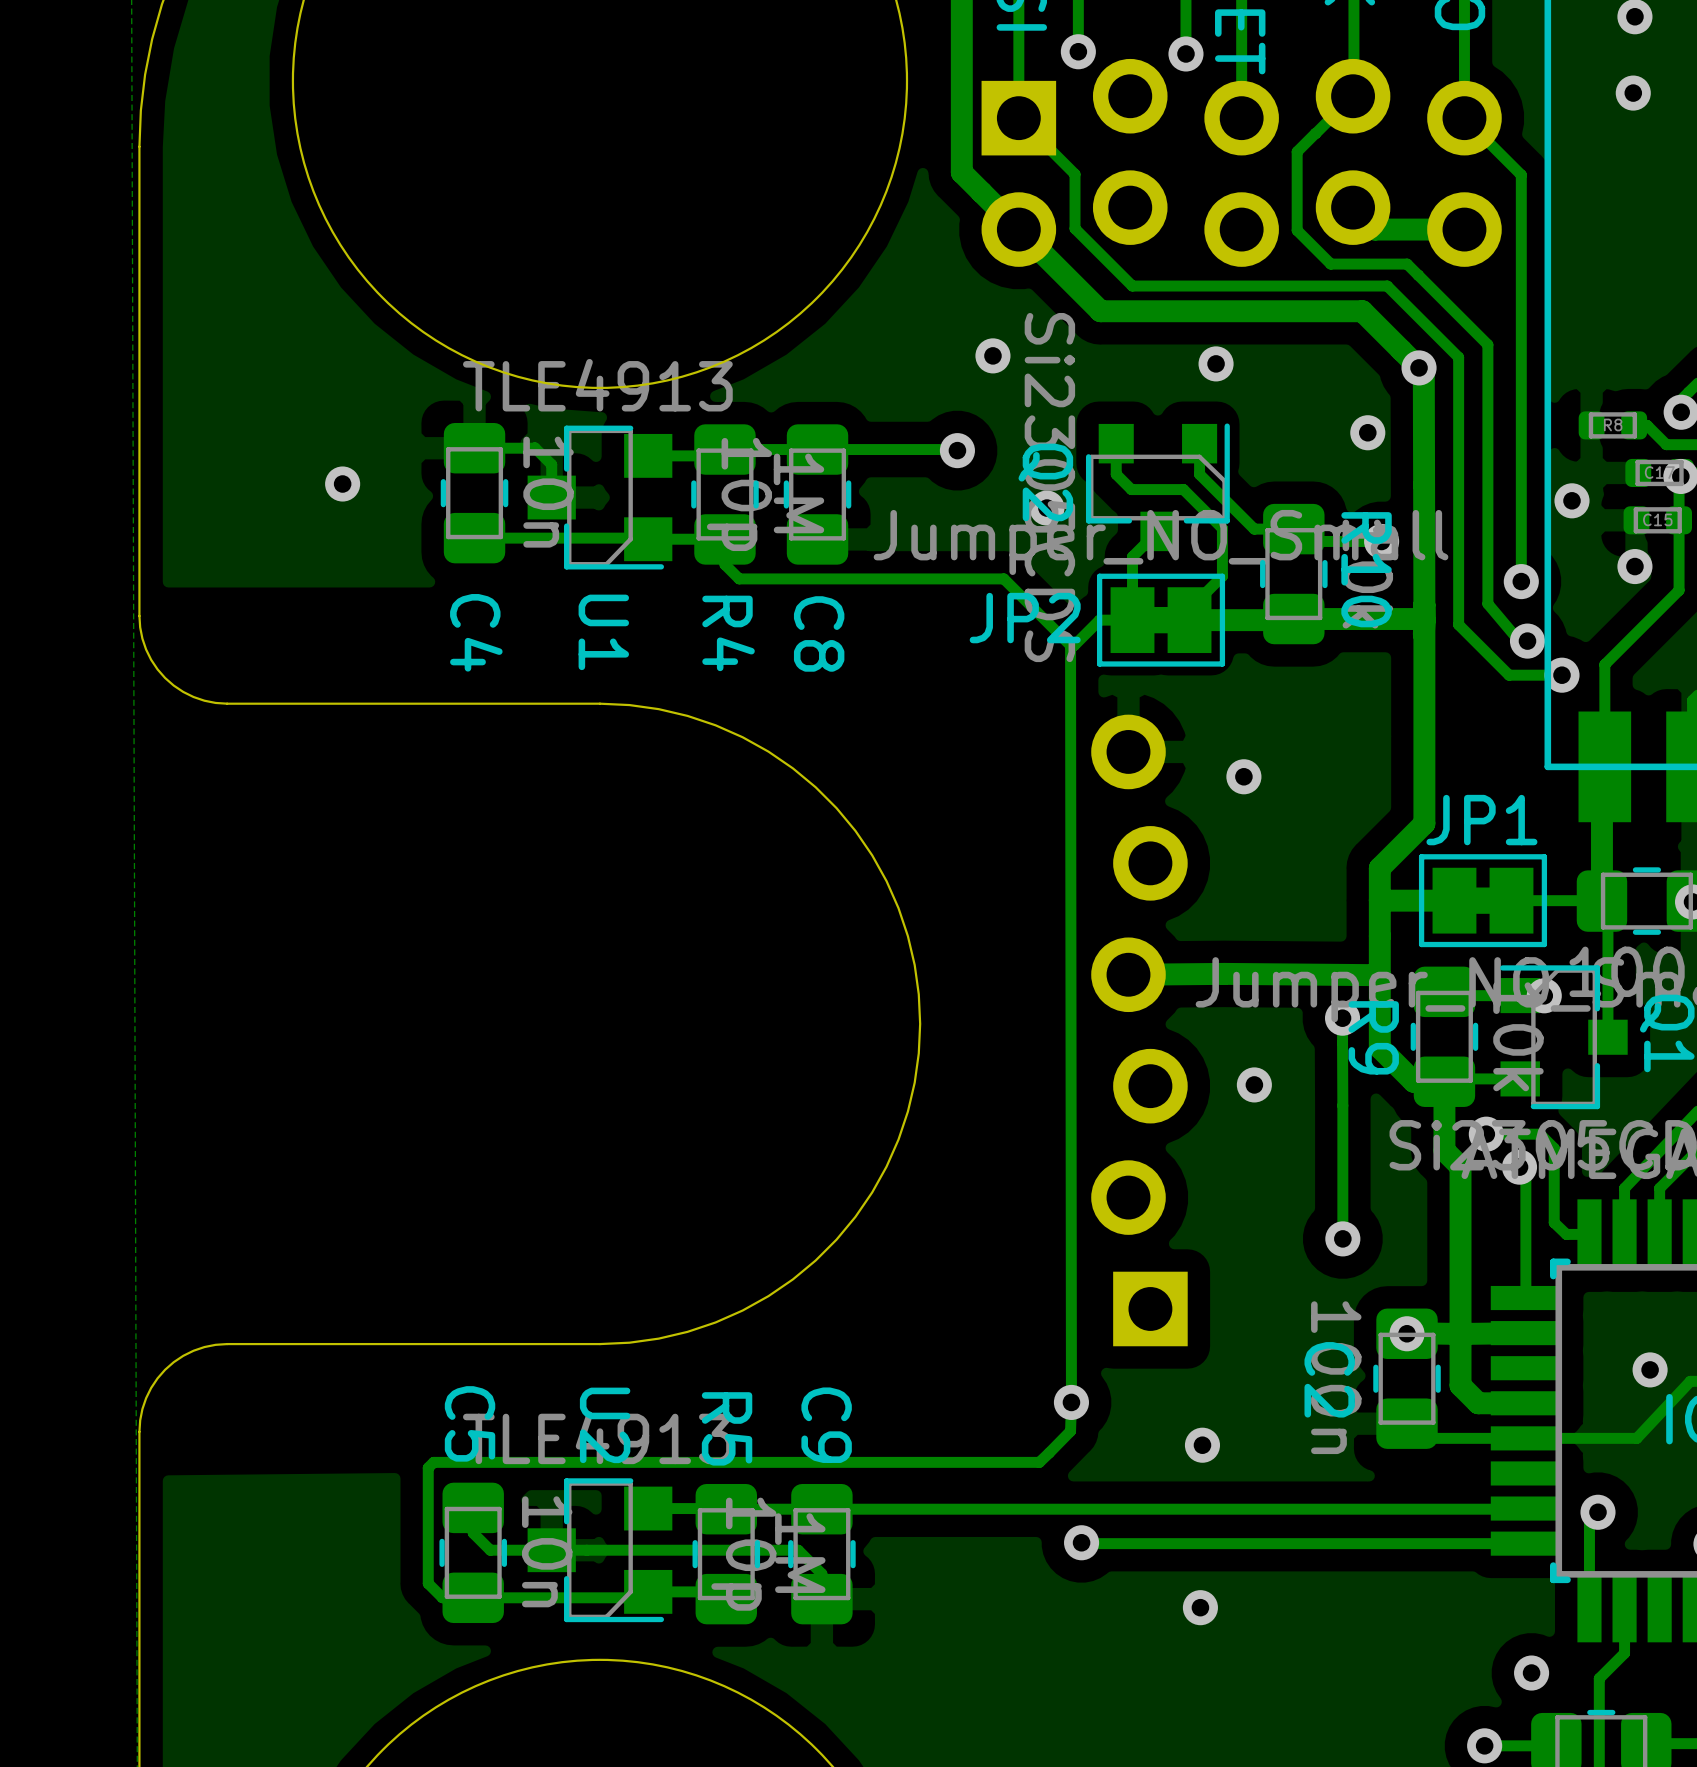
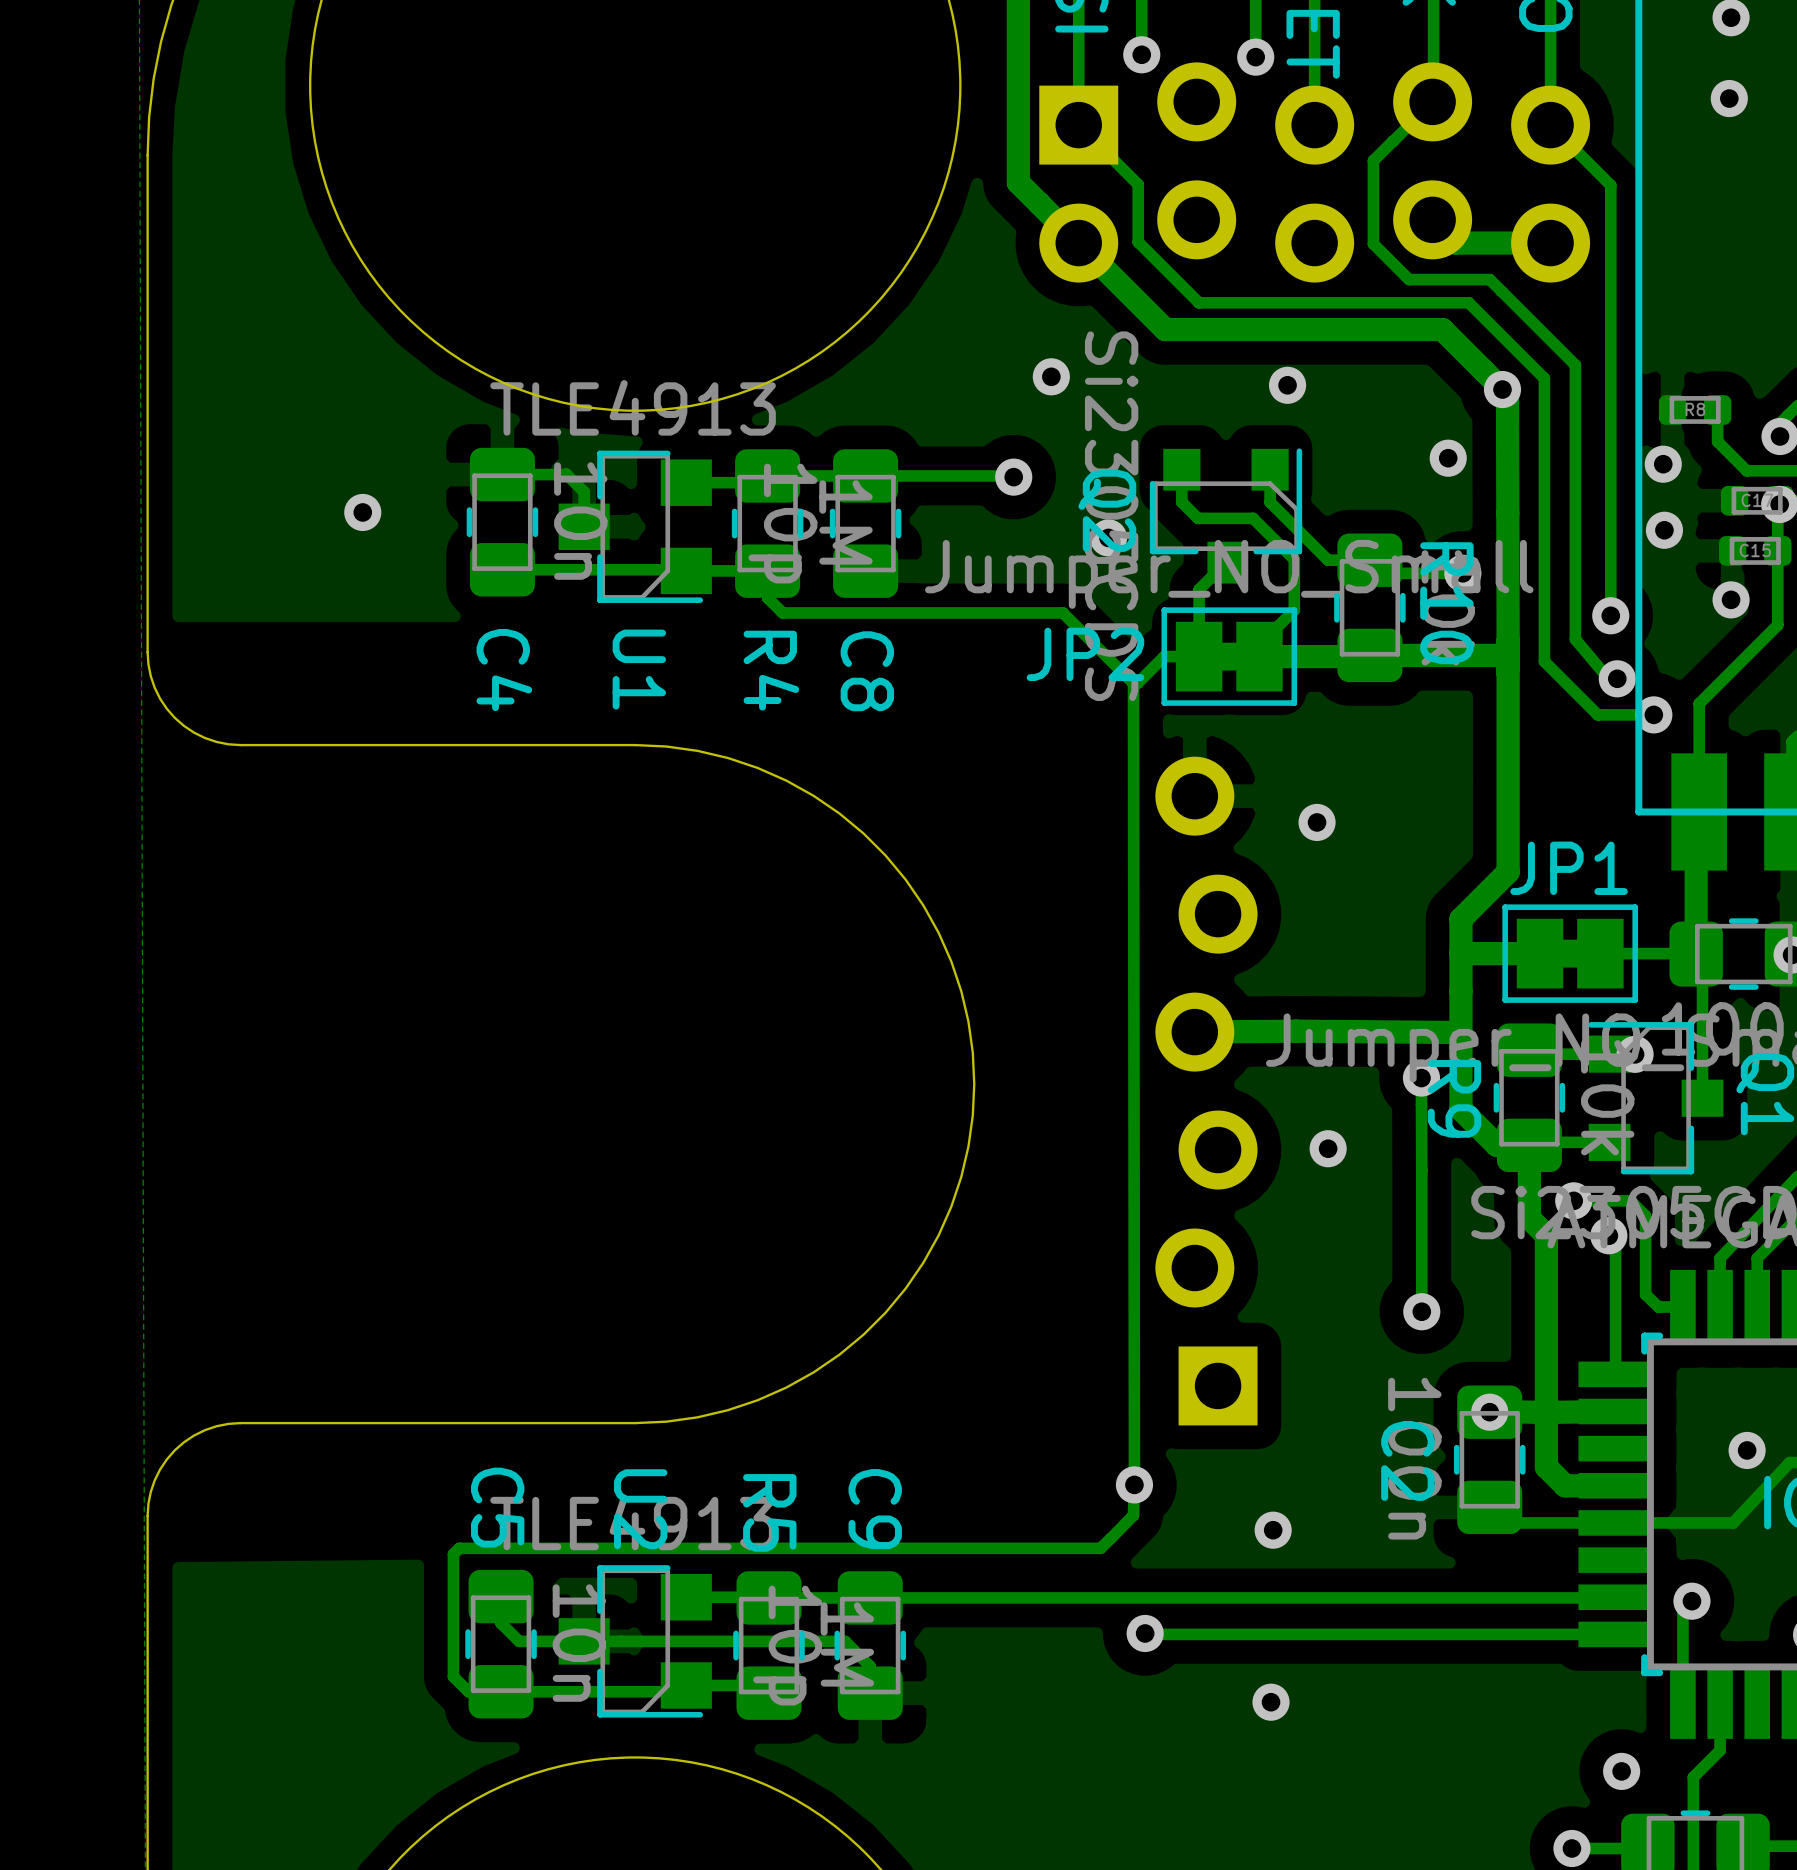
R8 position: (1612, 425) -> (1695, 409)
track: (1634, 425) (1647, 425) (1666, 444) -> (1717, 409) (1717, 441) (1746, 470) (1764, 470)
via: none -> (1663, 464)

